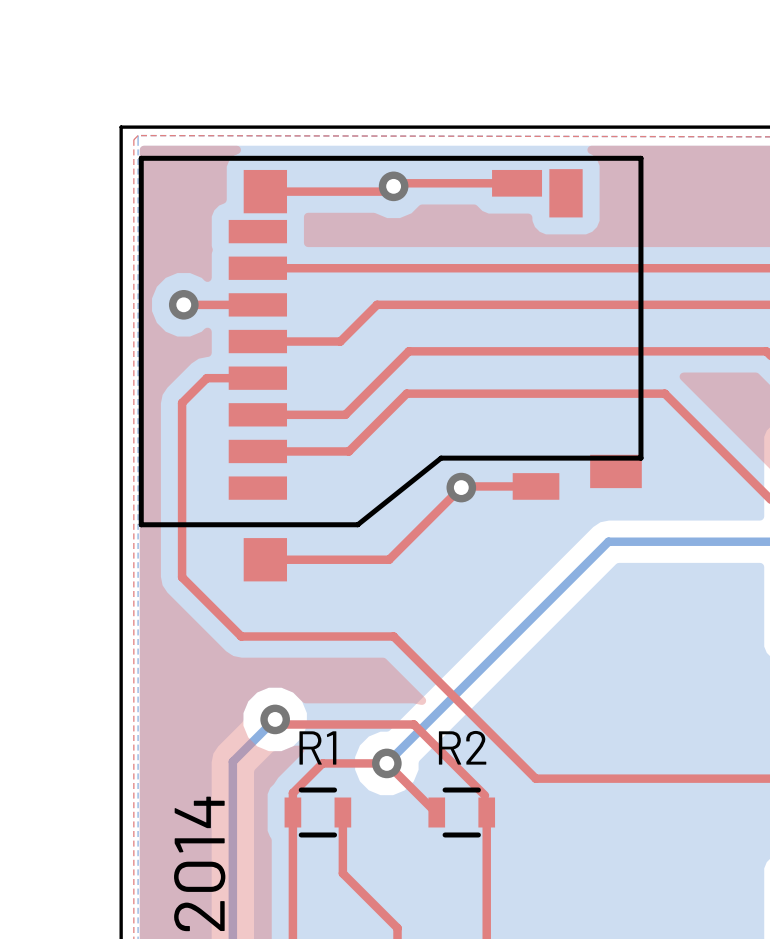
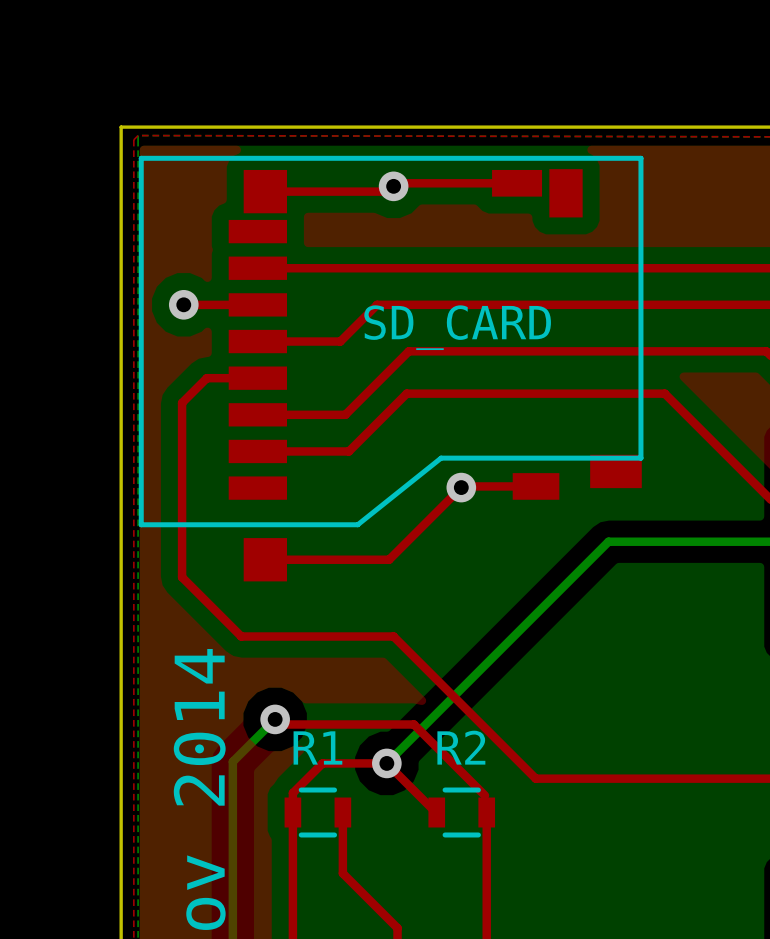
part value: none -> SD_CARD (457, 327)

